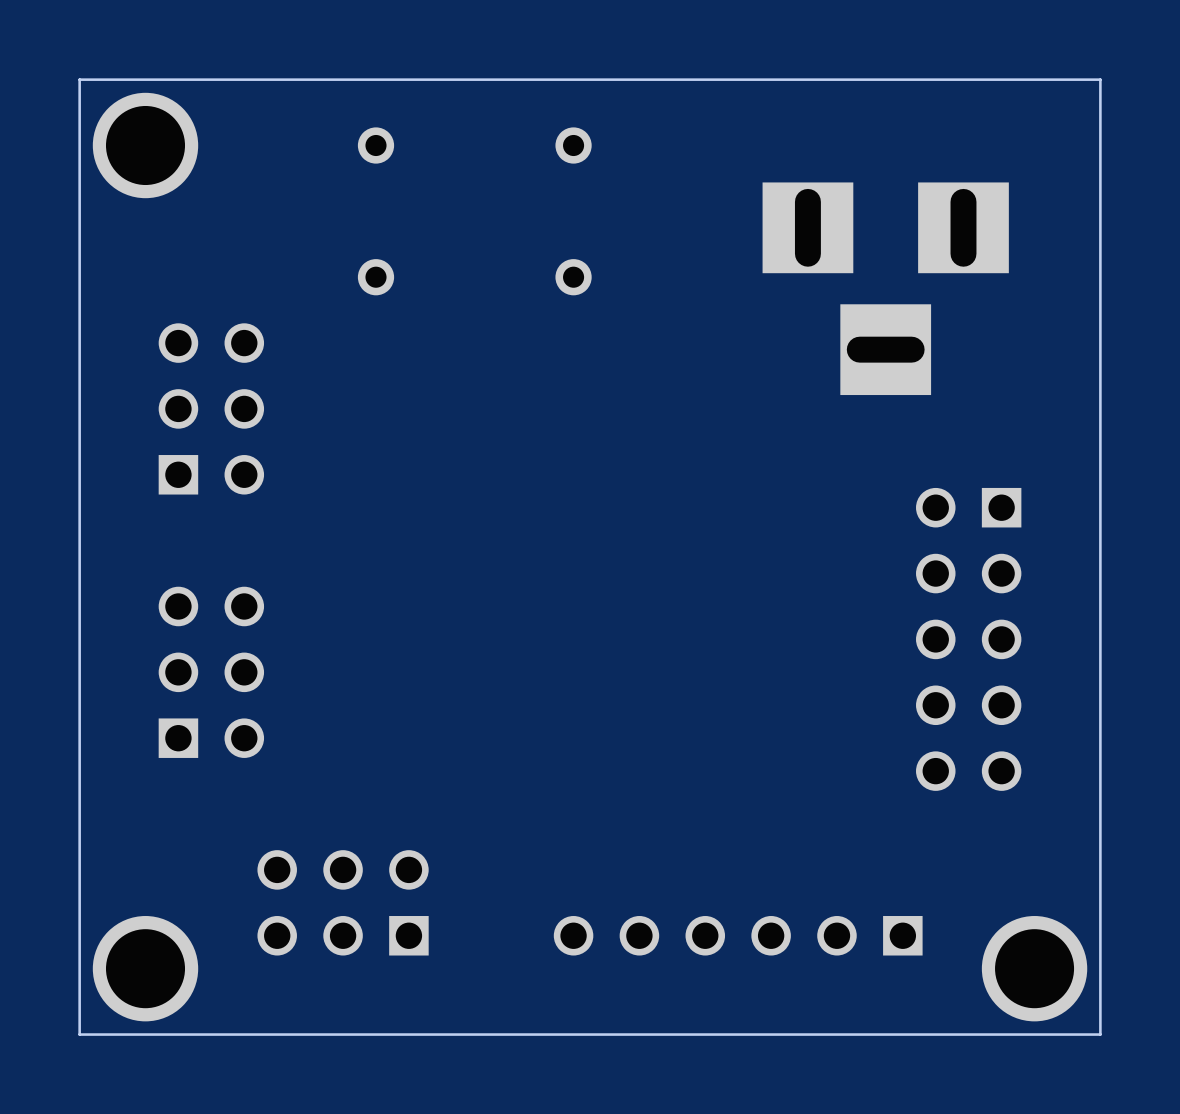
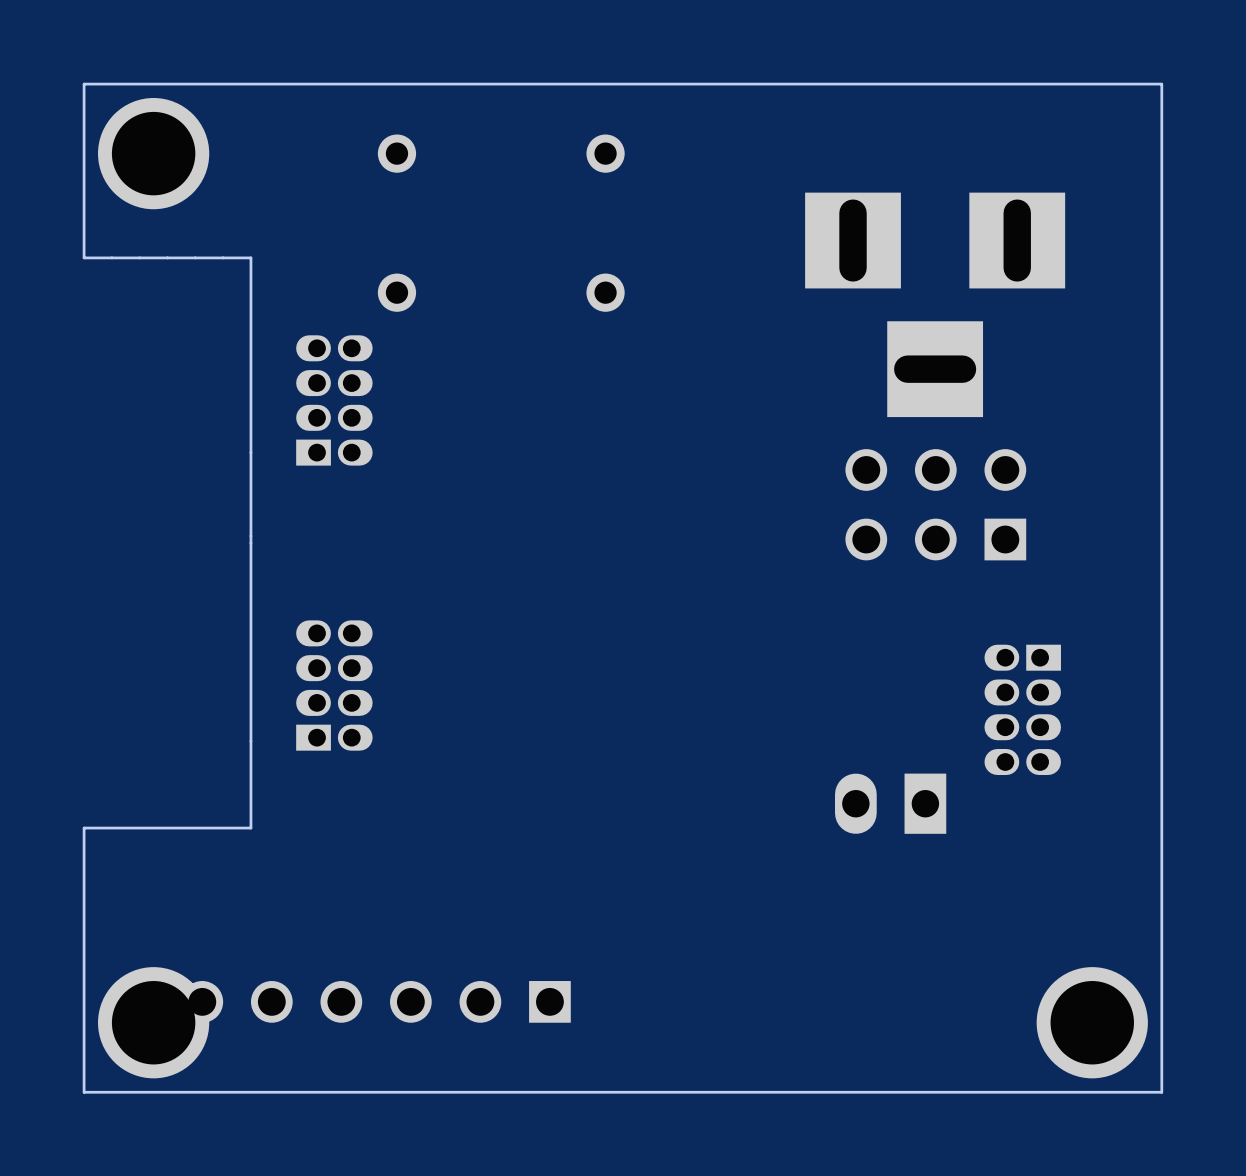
board edge: (79, 244) (79, 784) -> (84, 257) (250, 257) (250, 828) (84, 828)
part: none -> (334, 400)
part: (211, 408) -> none
part: none -> (935, 504)
part: (968, 639) -> none
part: none -> (334, 685)
part: (211, 672) -> none
part: none -> (1022, 709)
part: none -> (890, 803)
part: (343, 902) -> none
part position: (738, 935) -> (376, 1001)

